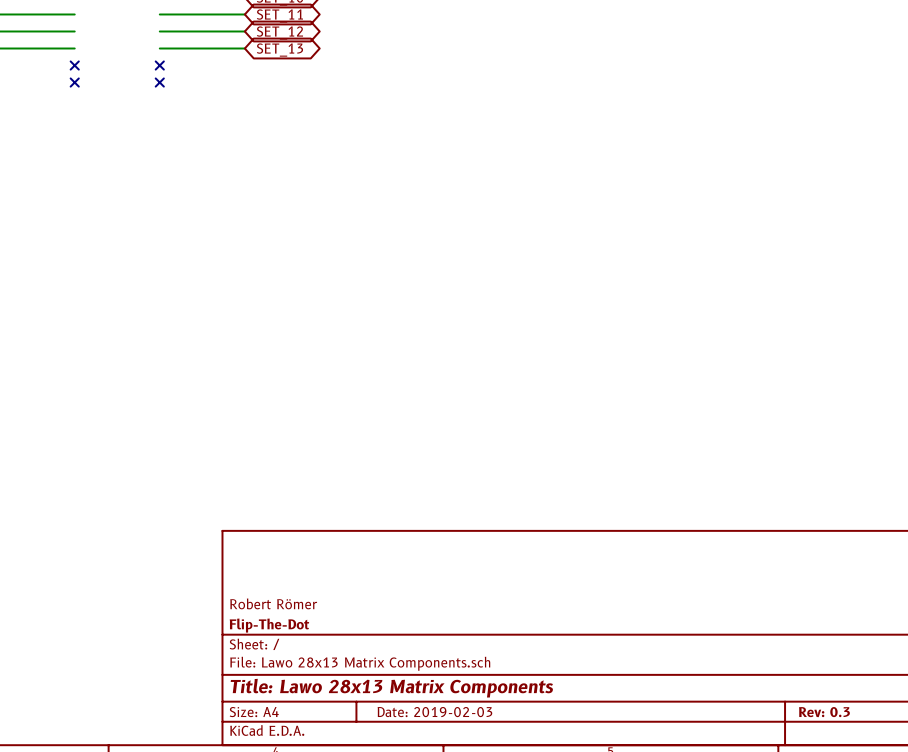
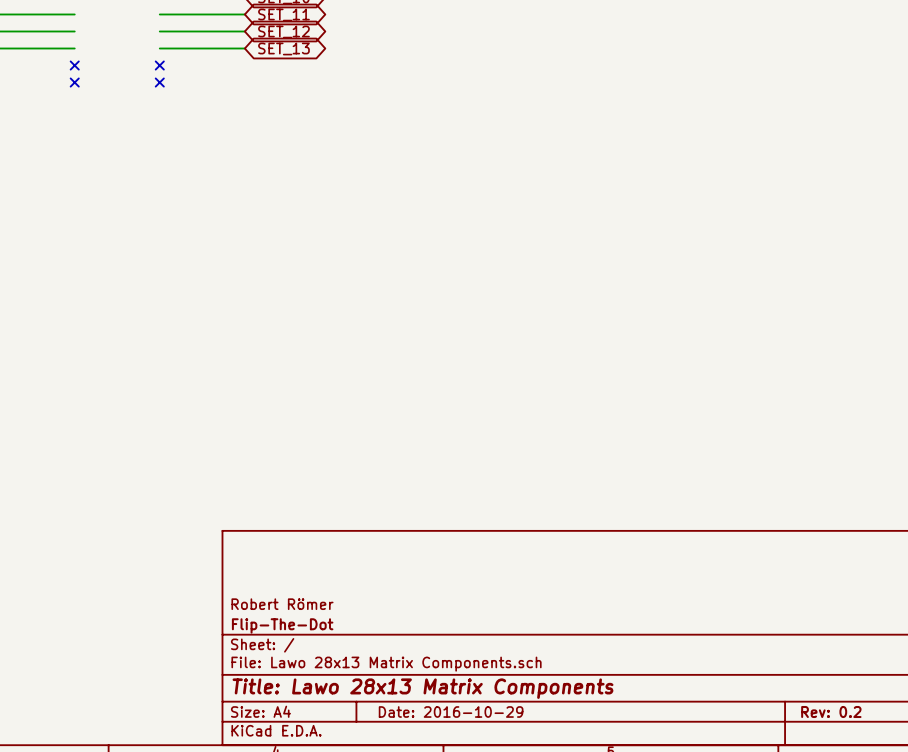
title block: Date: 2019-02-03 (434, 712) -> Date: 2016-10-29 (451, 712)
title block: Rev: 0.3 (824, 712) -> Rev: 0.2 (831, 712)

